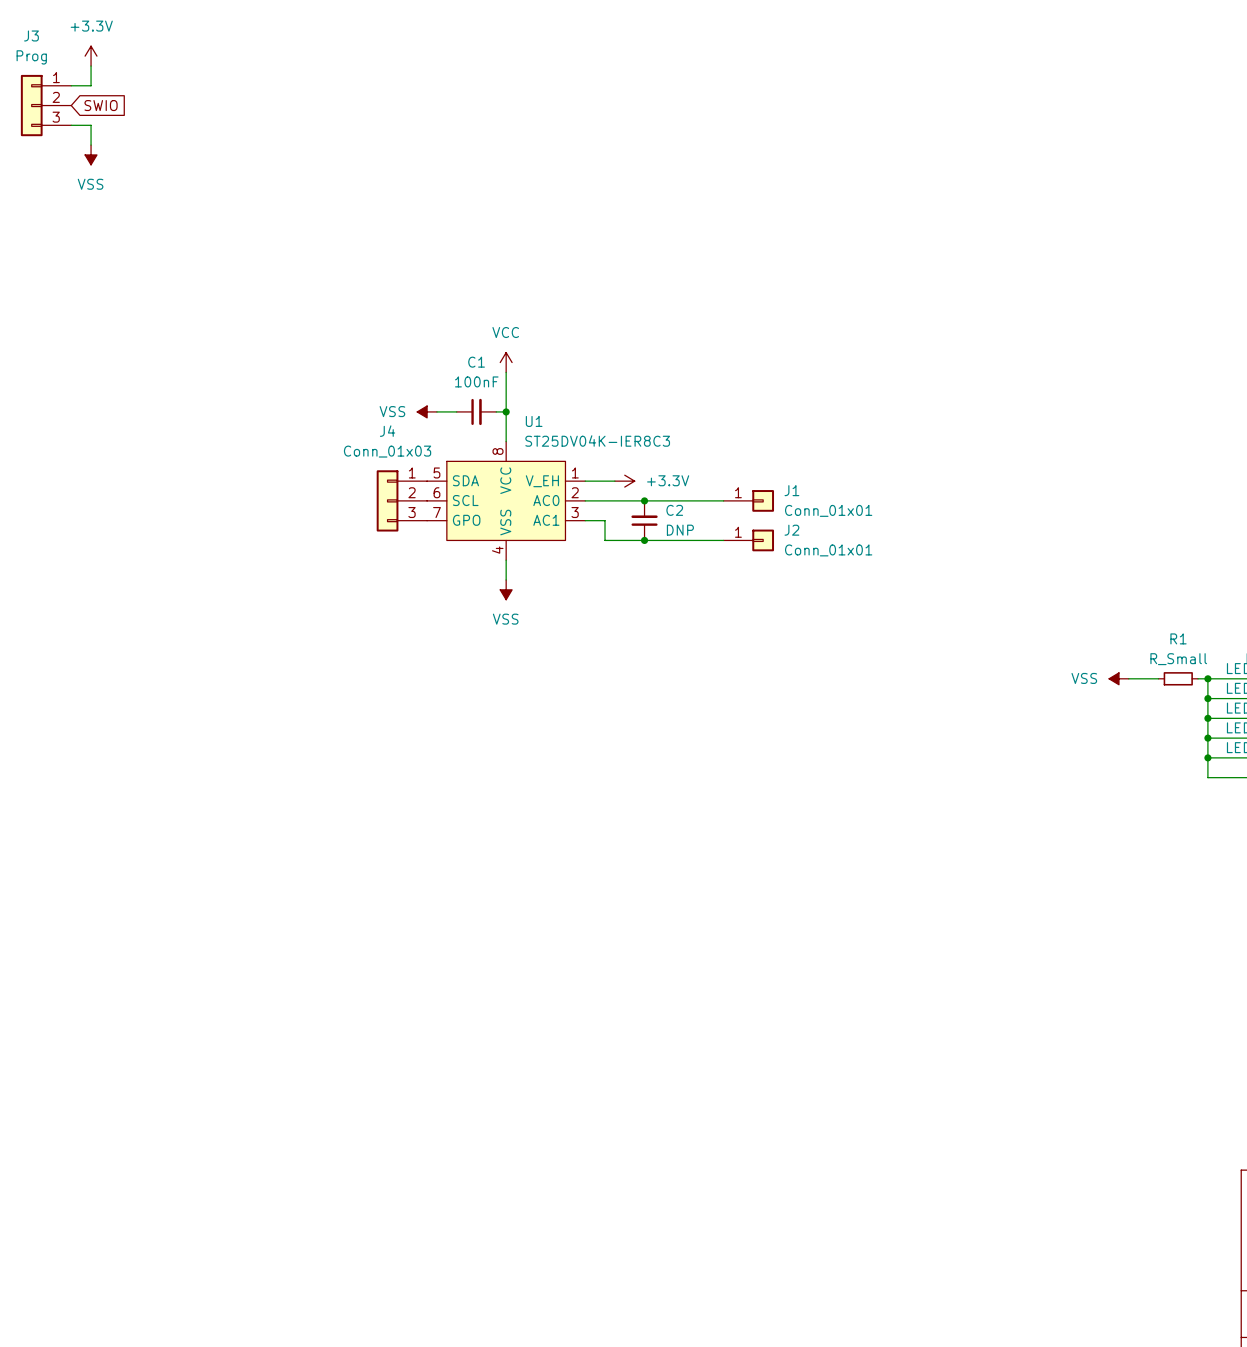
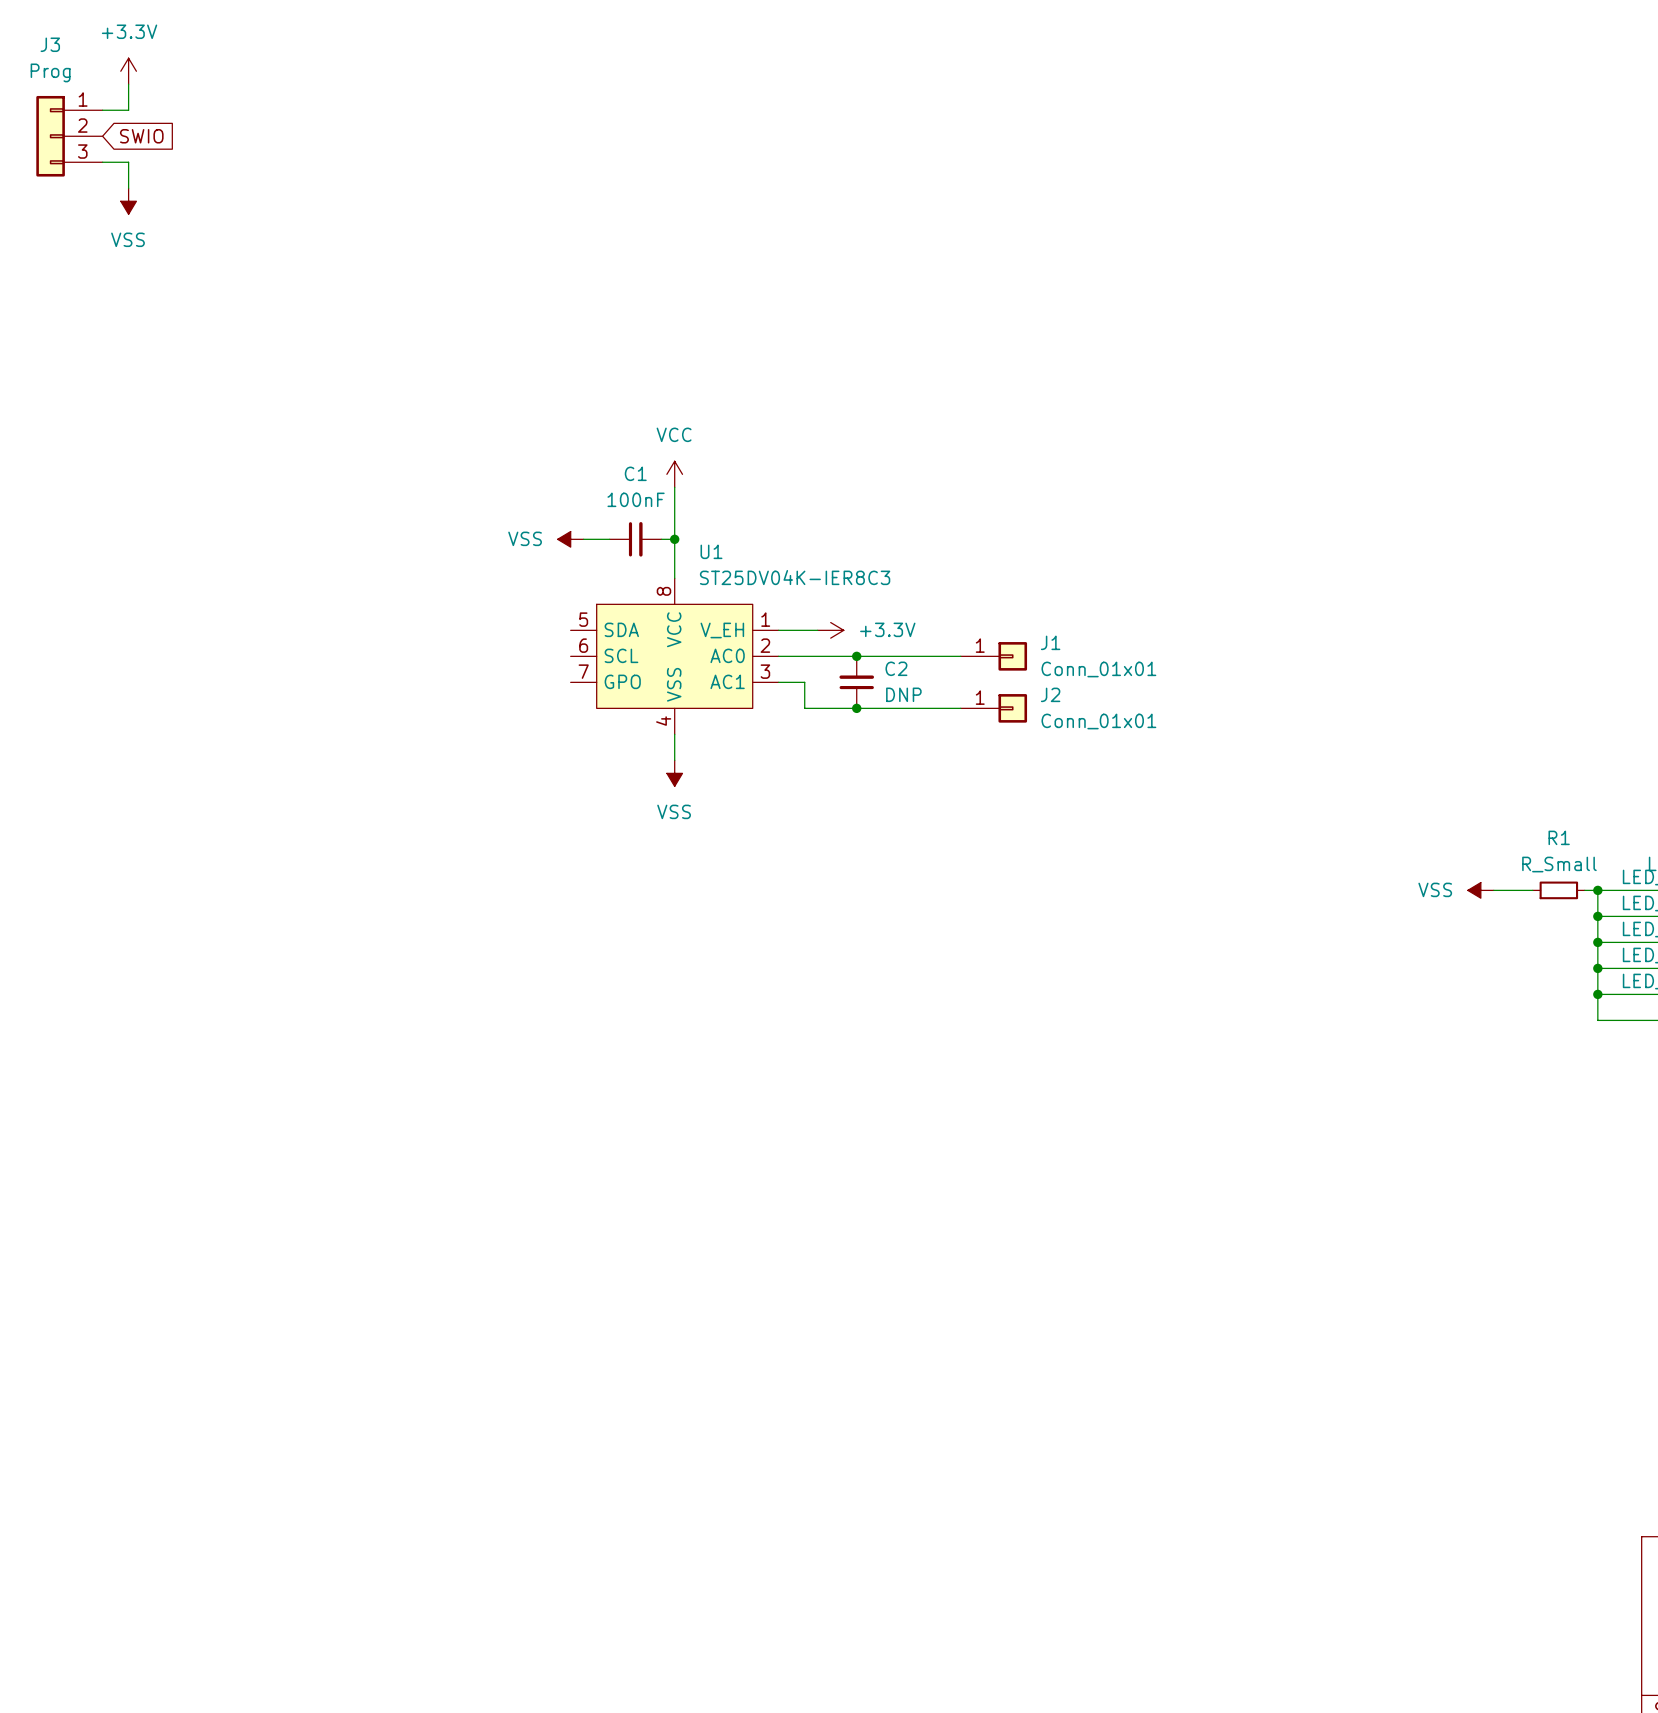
J4: Conn_01x03 (401, 500) -> none

